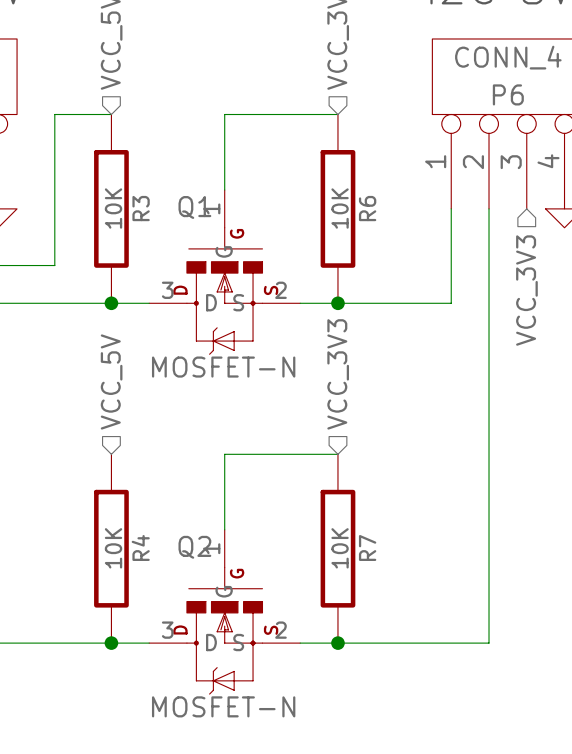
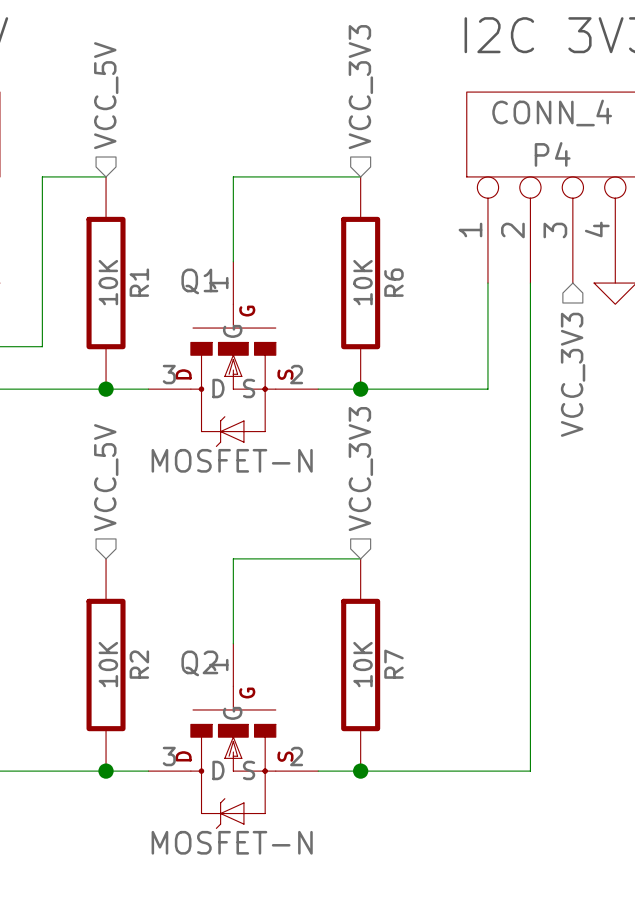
P6 name: P6 (508, 94) -> P4 (552, 154)
R3 name: R3 (141, 208) -> R1 (139, 282)
R4 name: R4 (140, 547) -> R2 (139, 664)

